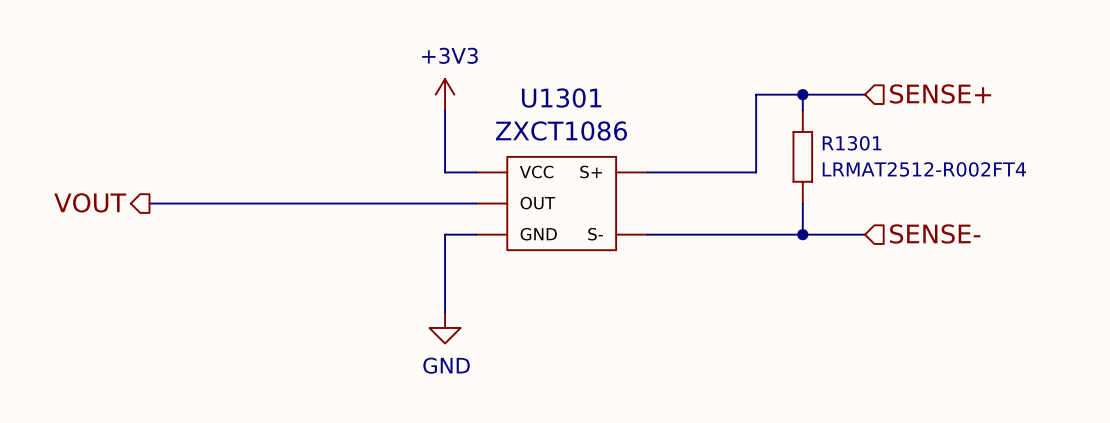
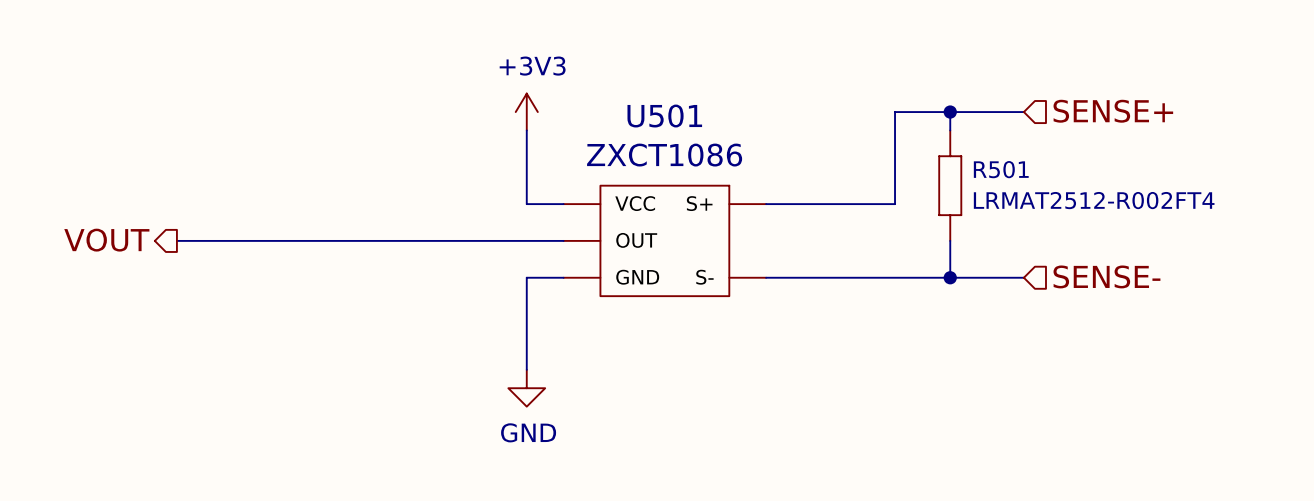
U1301 name: U1301 (561, 98) -> U501 (664, 116)
R1301 name: R1301 (852, 143) -> R501 (1001, 169)

